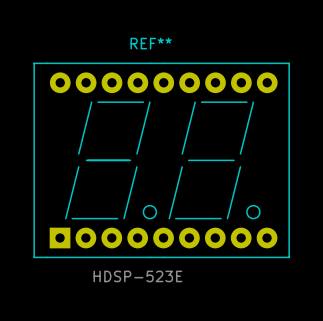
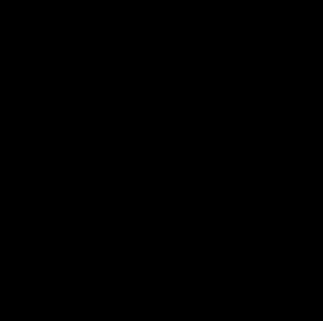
REF**: HDSP-523E (161, 160) -> none

